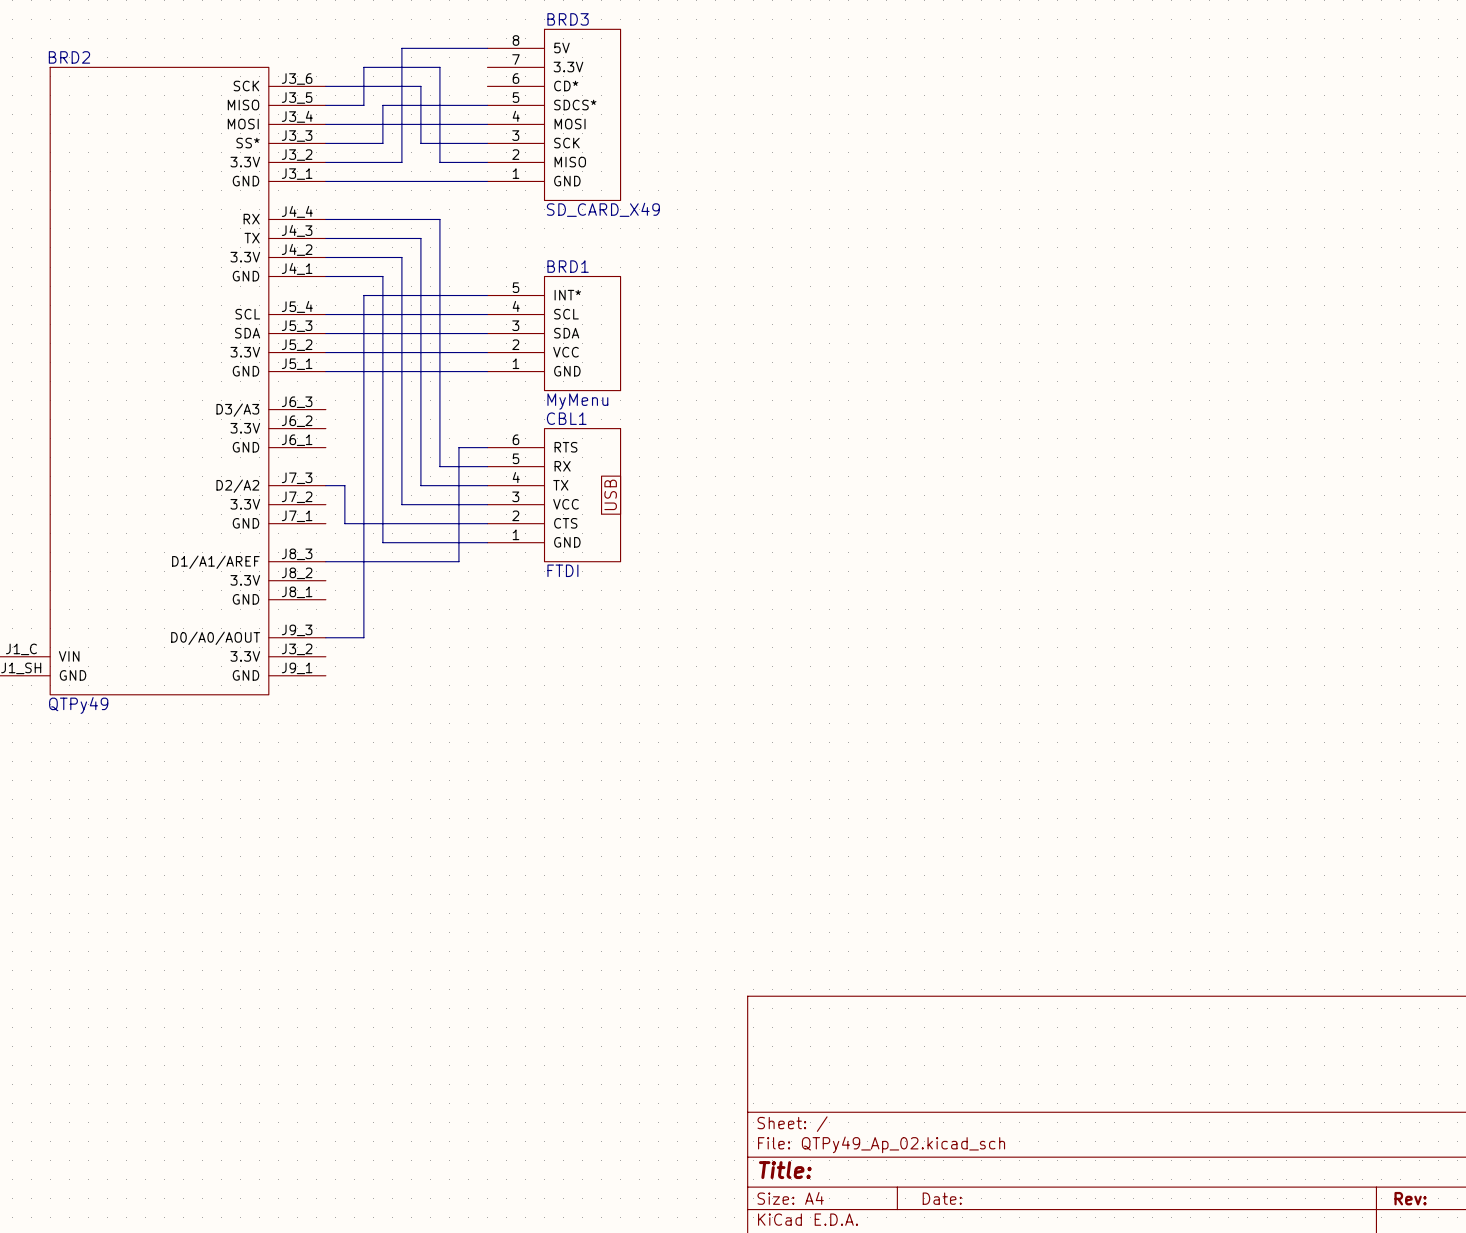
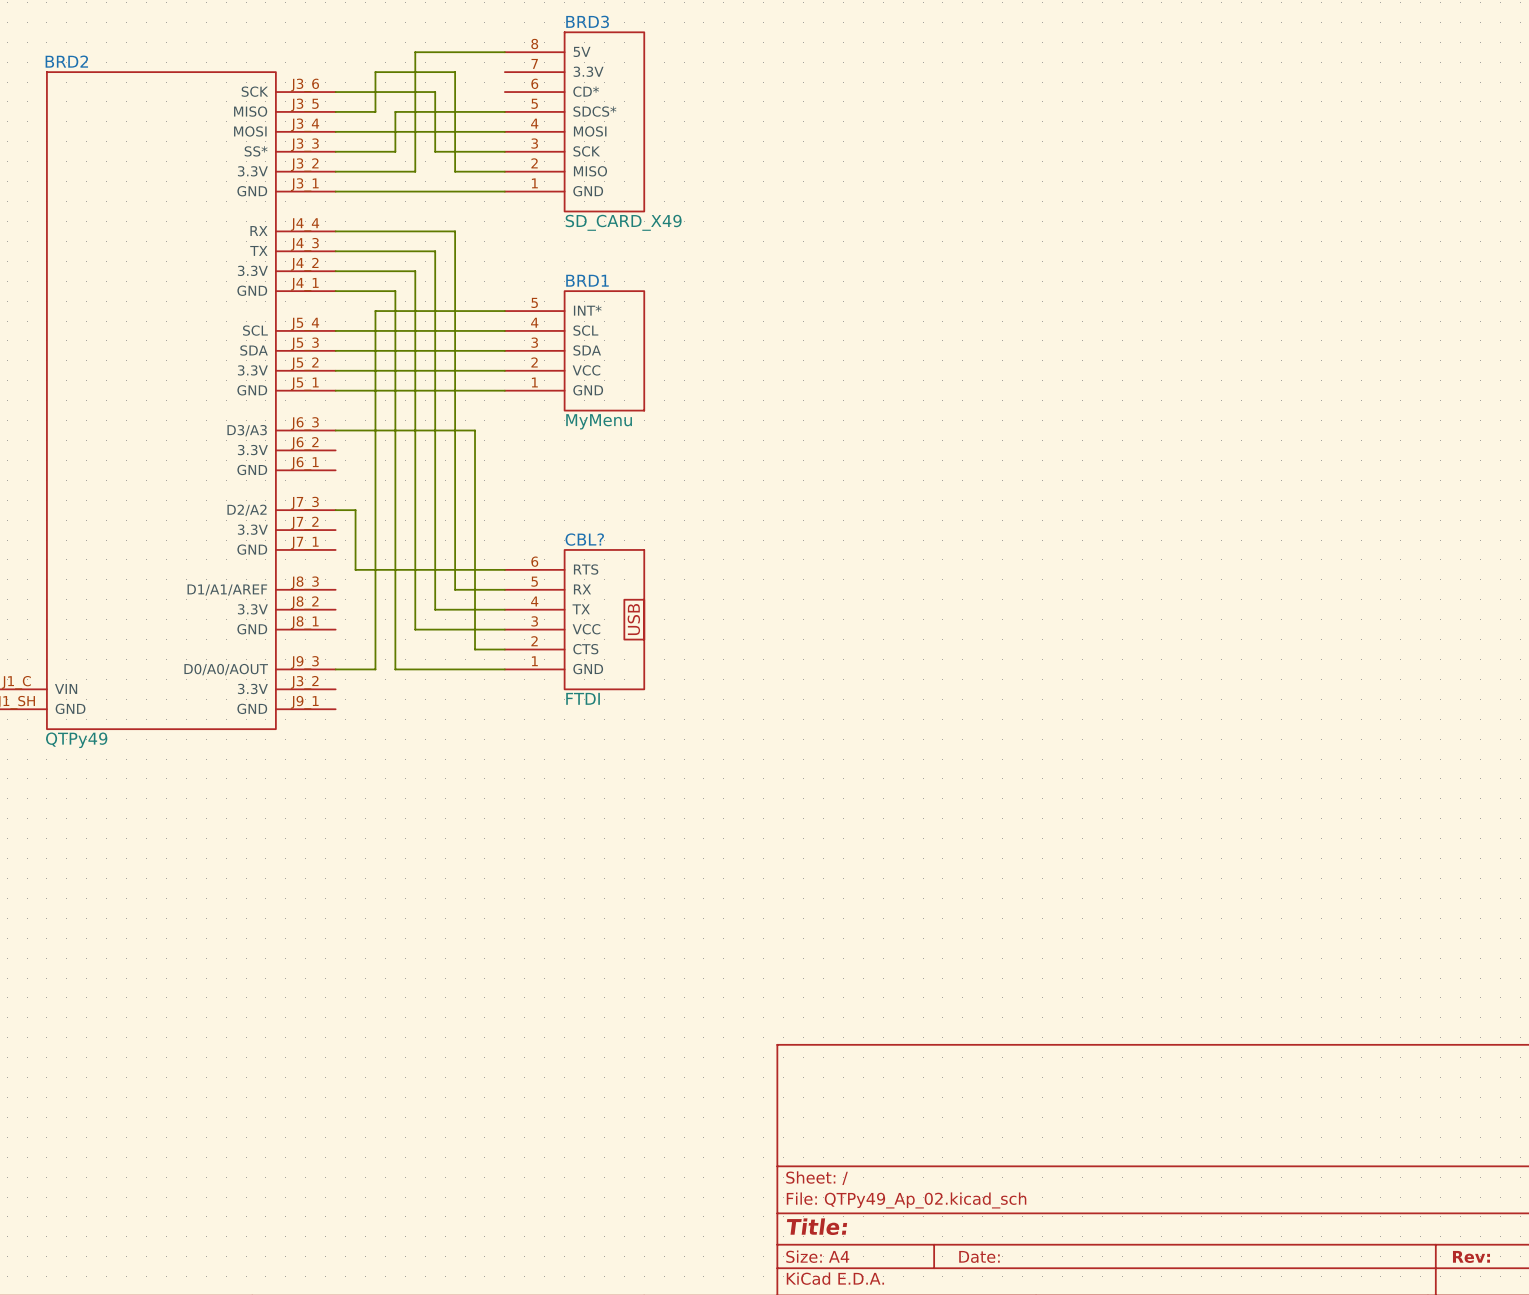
wire: (458, 447) (487, 447) -> (475, 470) (475, 430) (335, 430)
wire: (439, 466) (487, 466) -> (455, 490) (455, 589)
wire: (420, 485) (487, 485) -> (435, 510) (435, 609) (504, 609)
CBL1: FTDI (554, 495) -> none
wire: (401, 504) (487, 504) -> (415, 530) (415, 629) (504, 629)
wire: (344, 523) (487, 523) -> (355, 549) (355, 569) (395, 569) (395, 669) (504, 669)
wire: (325, 561) (439, 561) -> none
wire: none -> (504, 589) (475, 589) (475, 649) (504, 649)
CBL?: none -> FTDI (574, 619)

